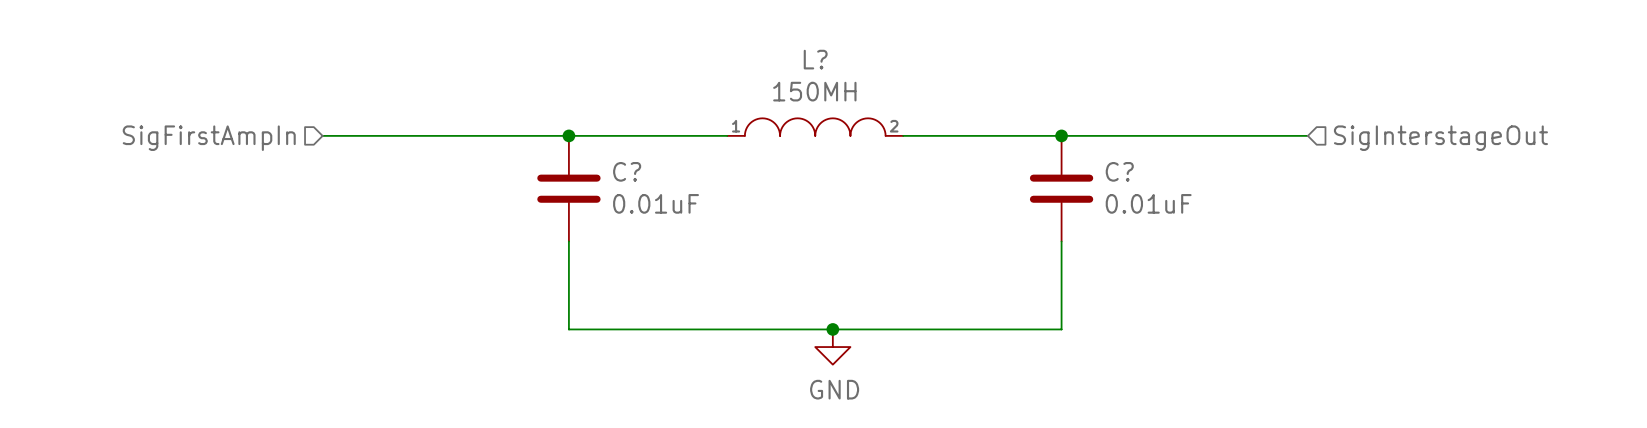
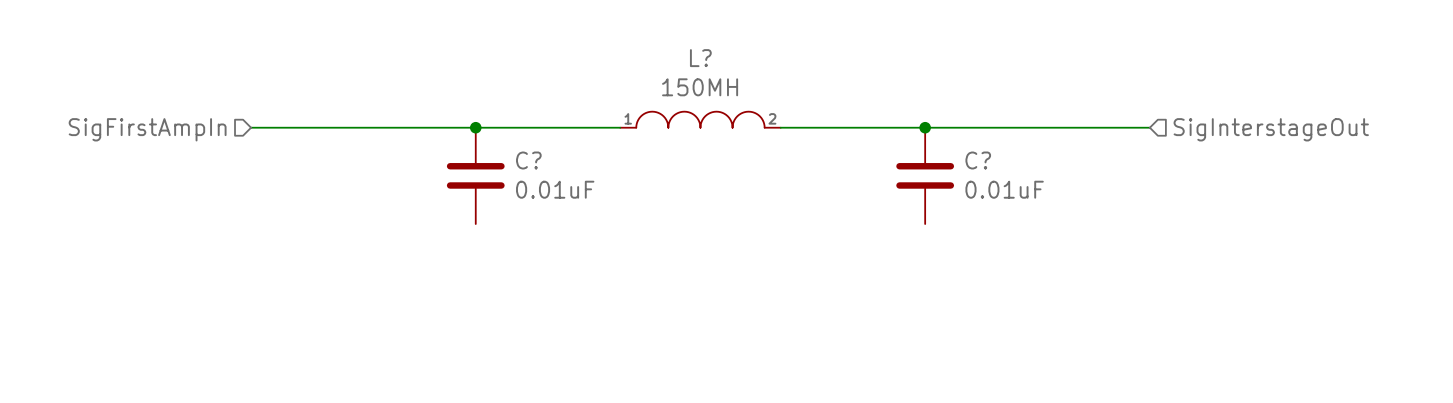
wire: (568, 241) (568, 329) (1061, 329) (1061, 241) -> none
junction: (832, 329) -> none
power symbol: GND (832, 347) -> none

